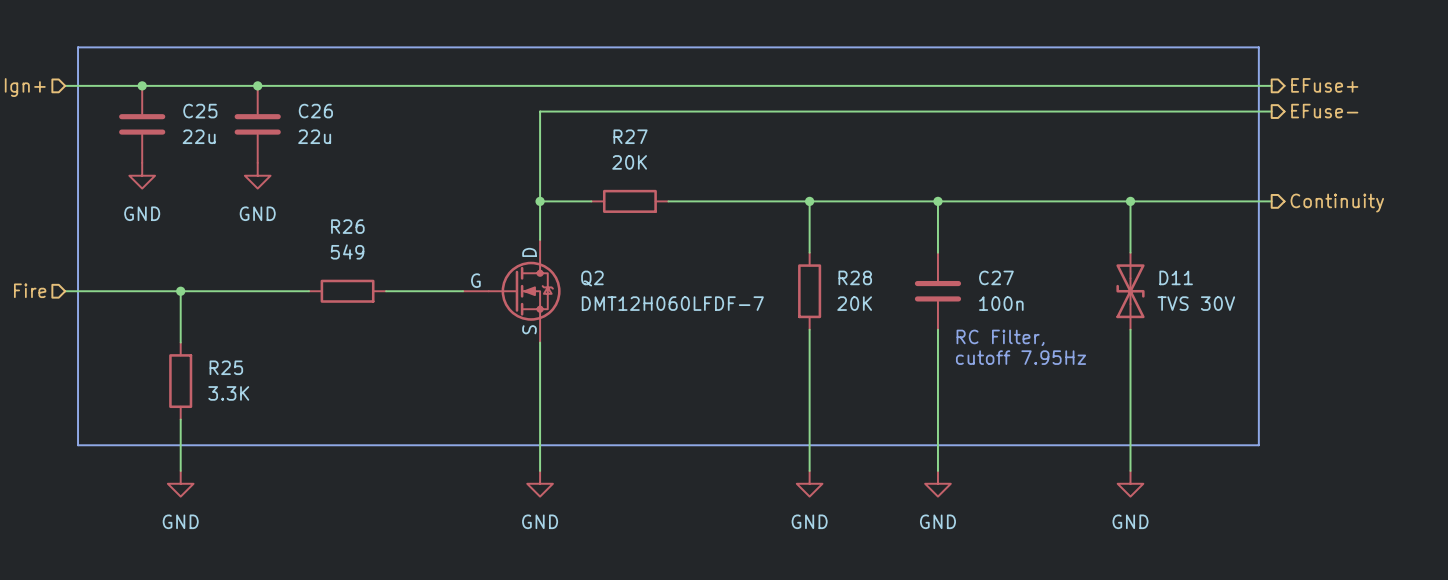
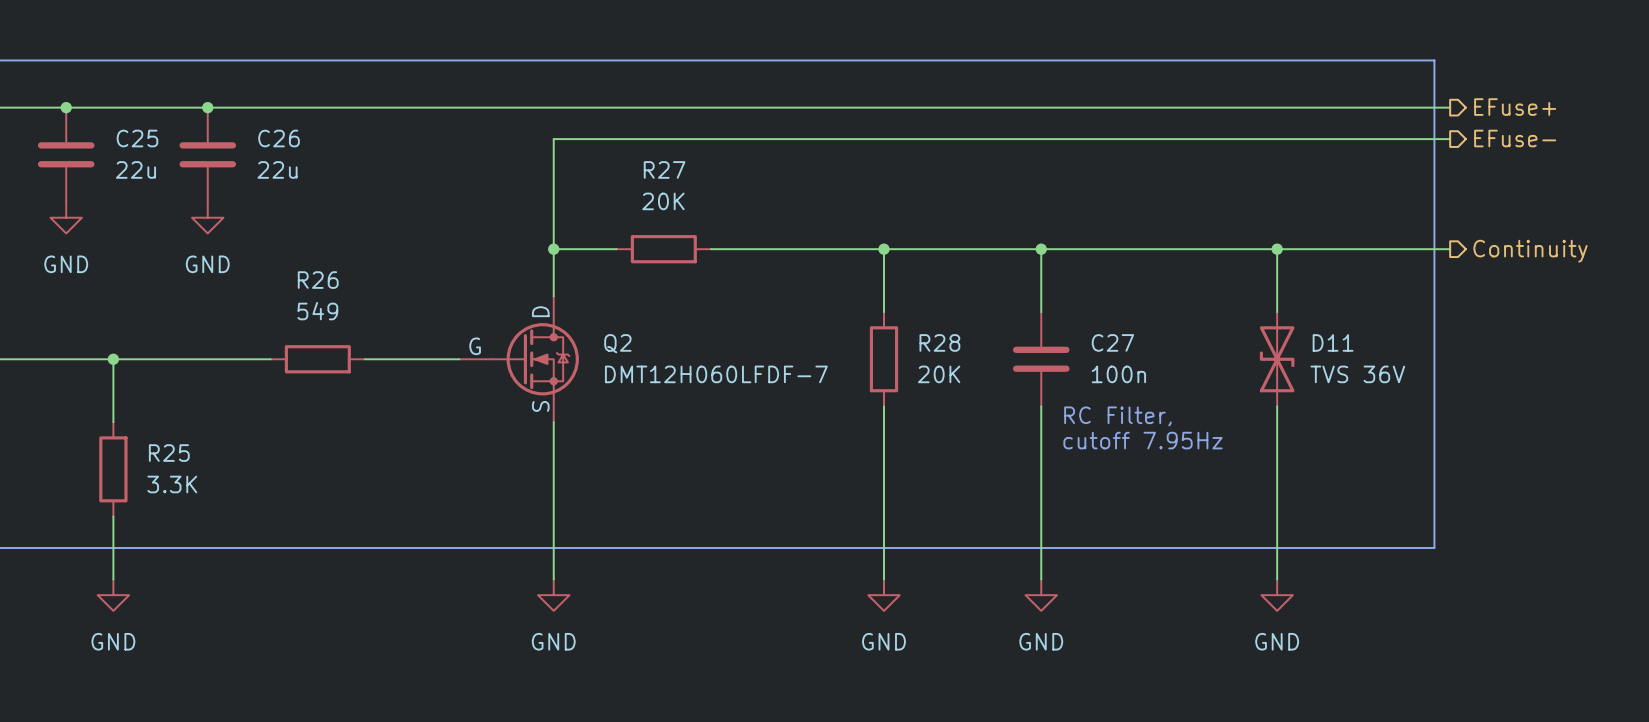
D11 value: TVS 30V (1196, 303) -> TVS 36V (1357, 374)

